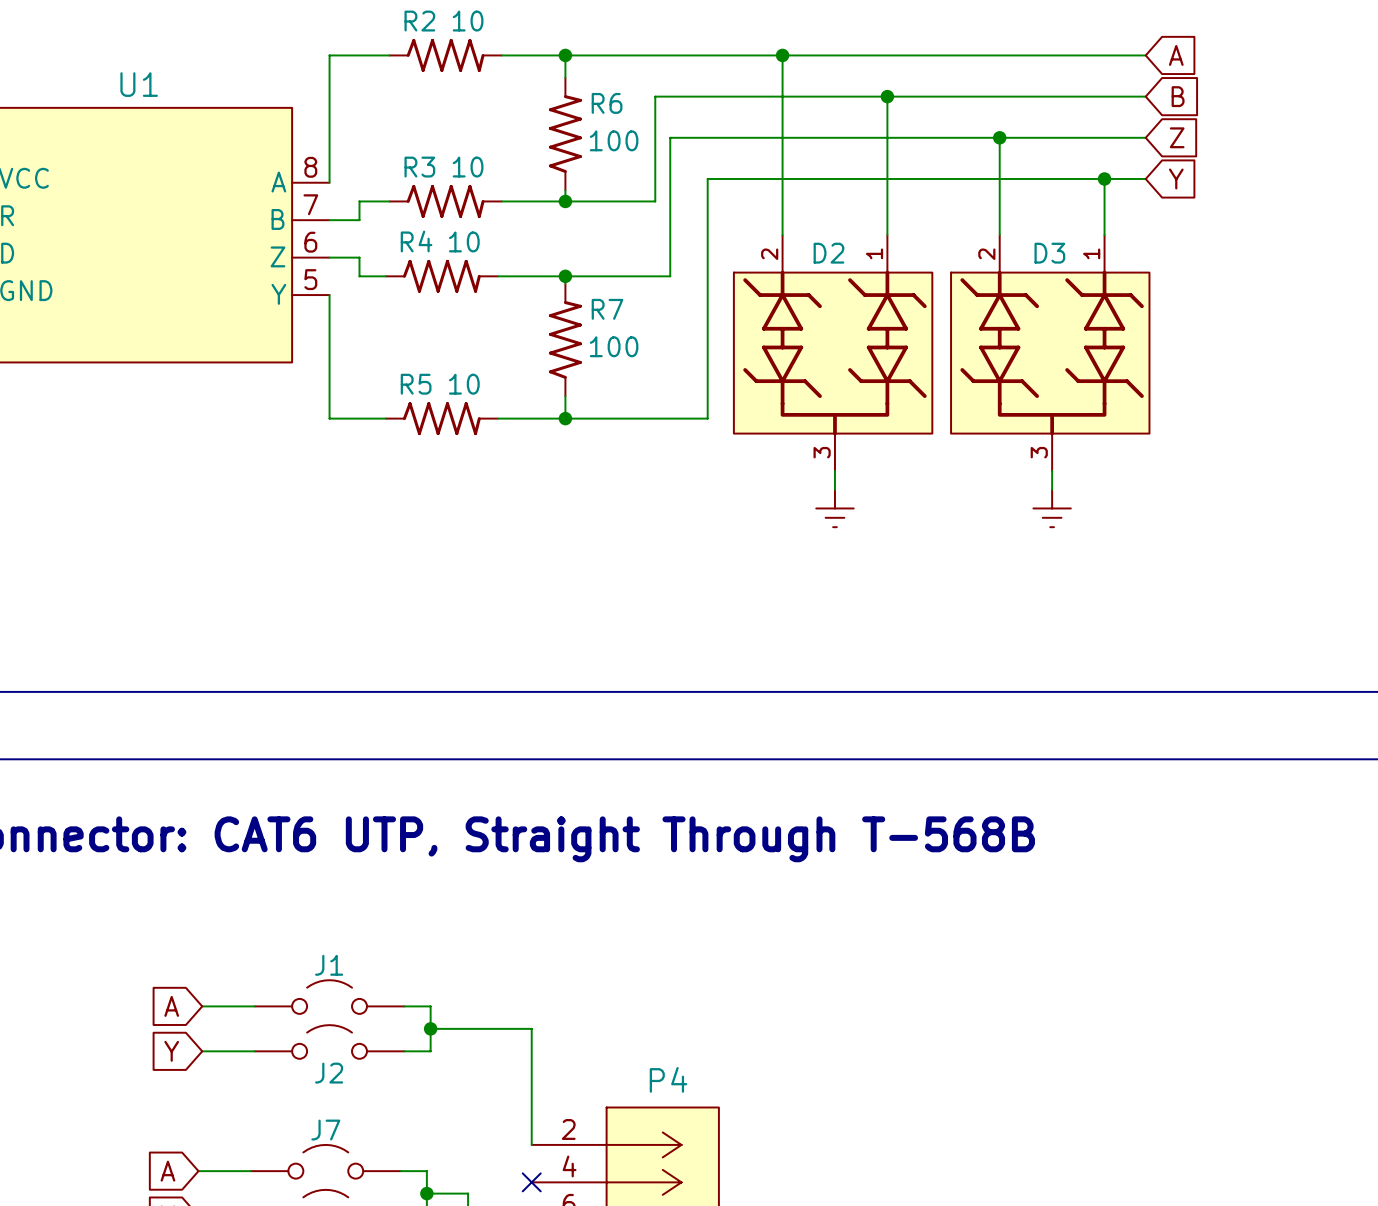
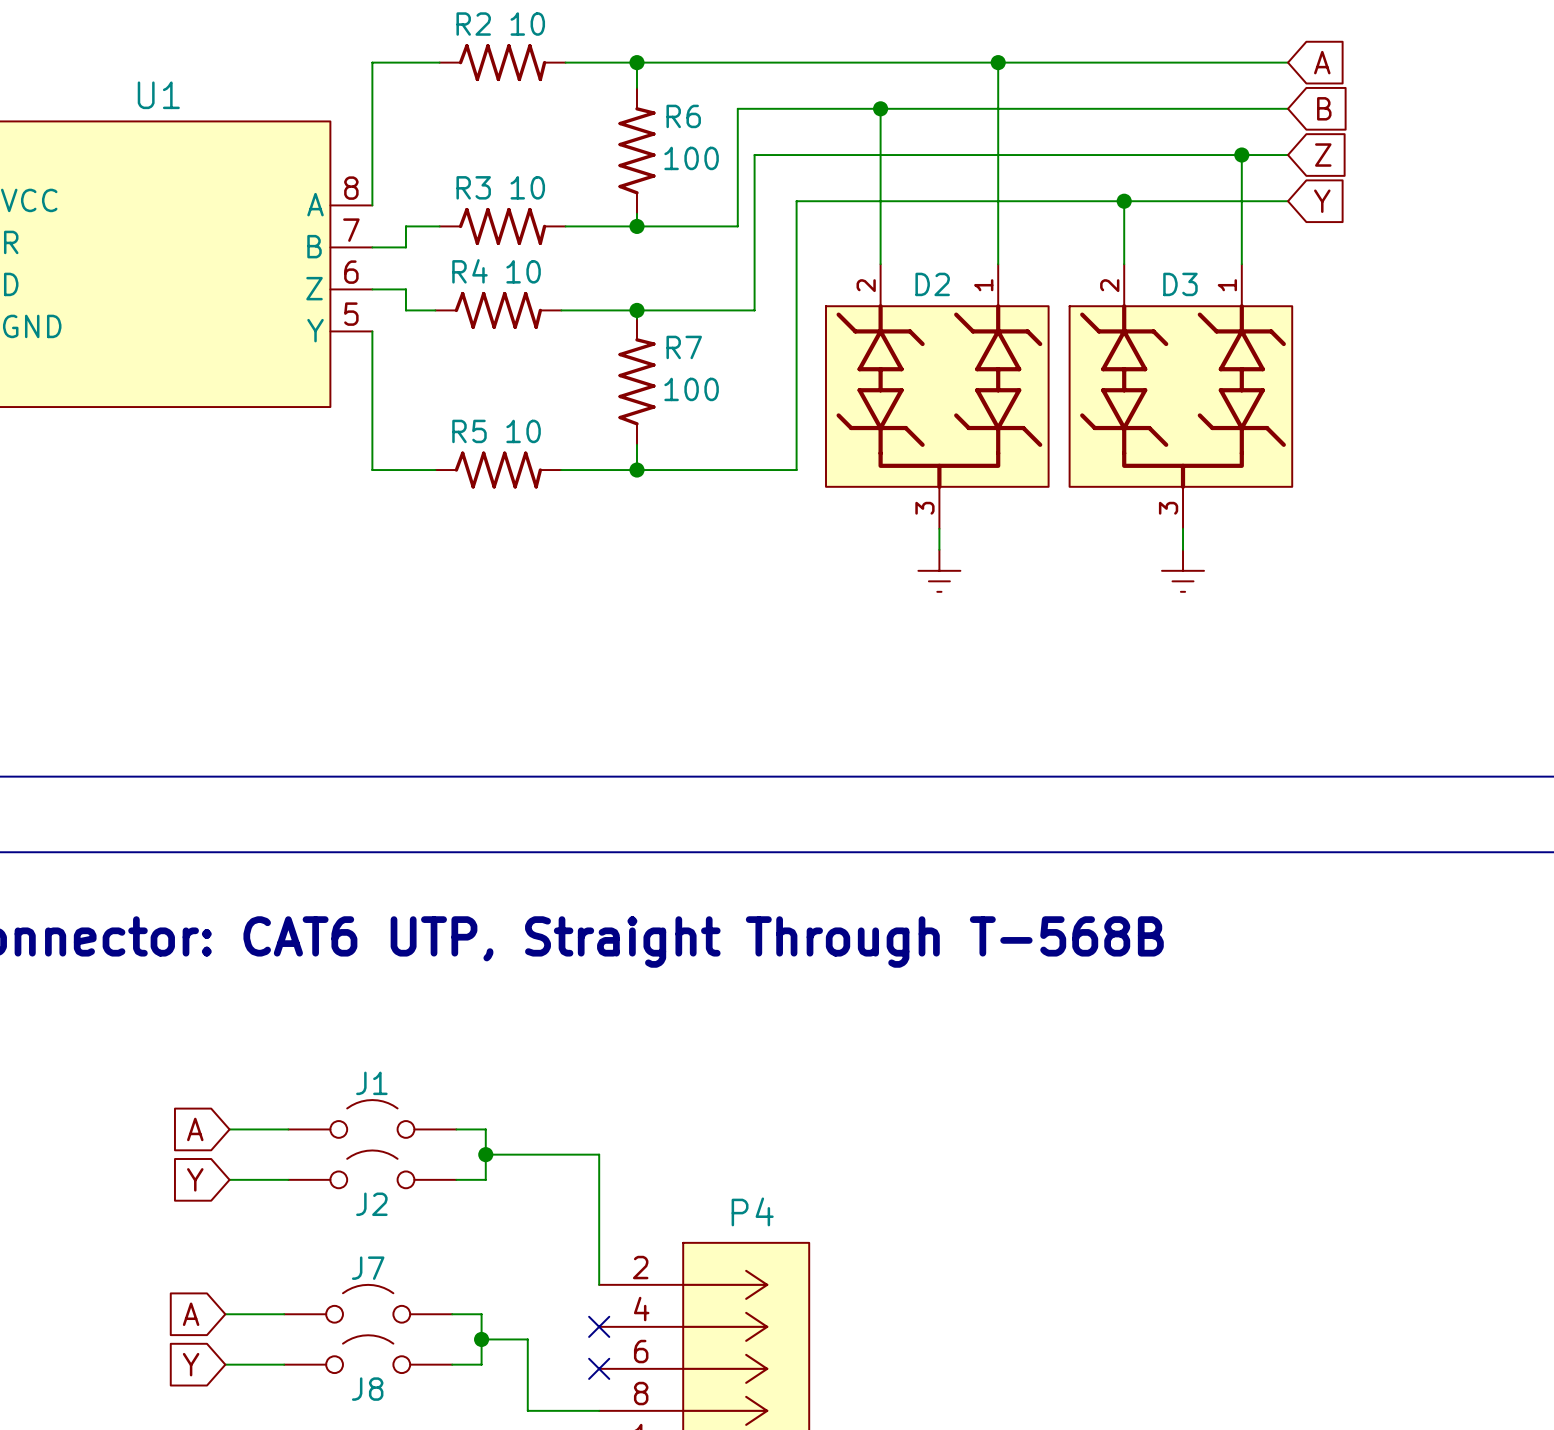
wire: (782, 55) (782, 96) -> (998, 62) (998, 108)
junction position: (782, 55) -> (880, 108)
junction position: (887, 96) -> (998, 62)
wire: (999, 137) (999, 178) -> (1241, 155) (1241, 201)
junction position: (999, 137) -> (1124, 201)
junction position: (1104, 178) -> (1241, 155)

